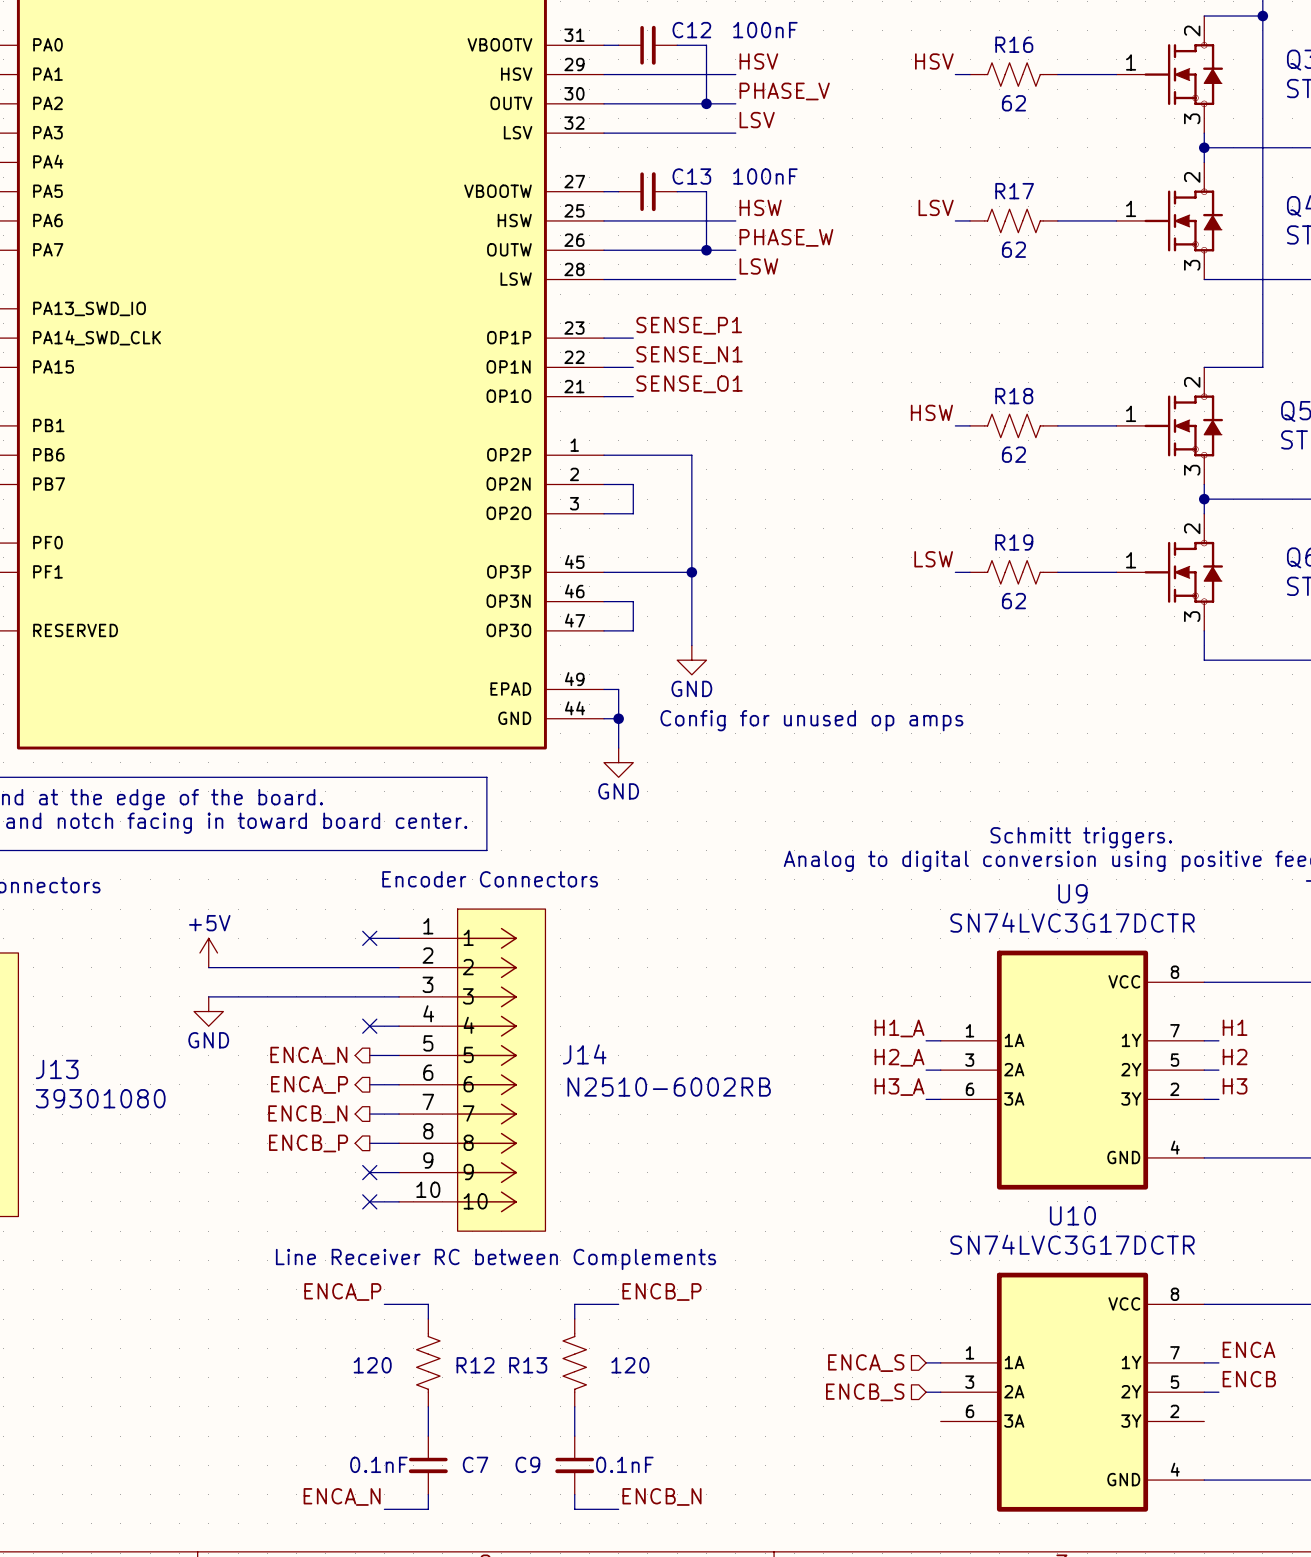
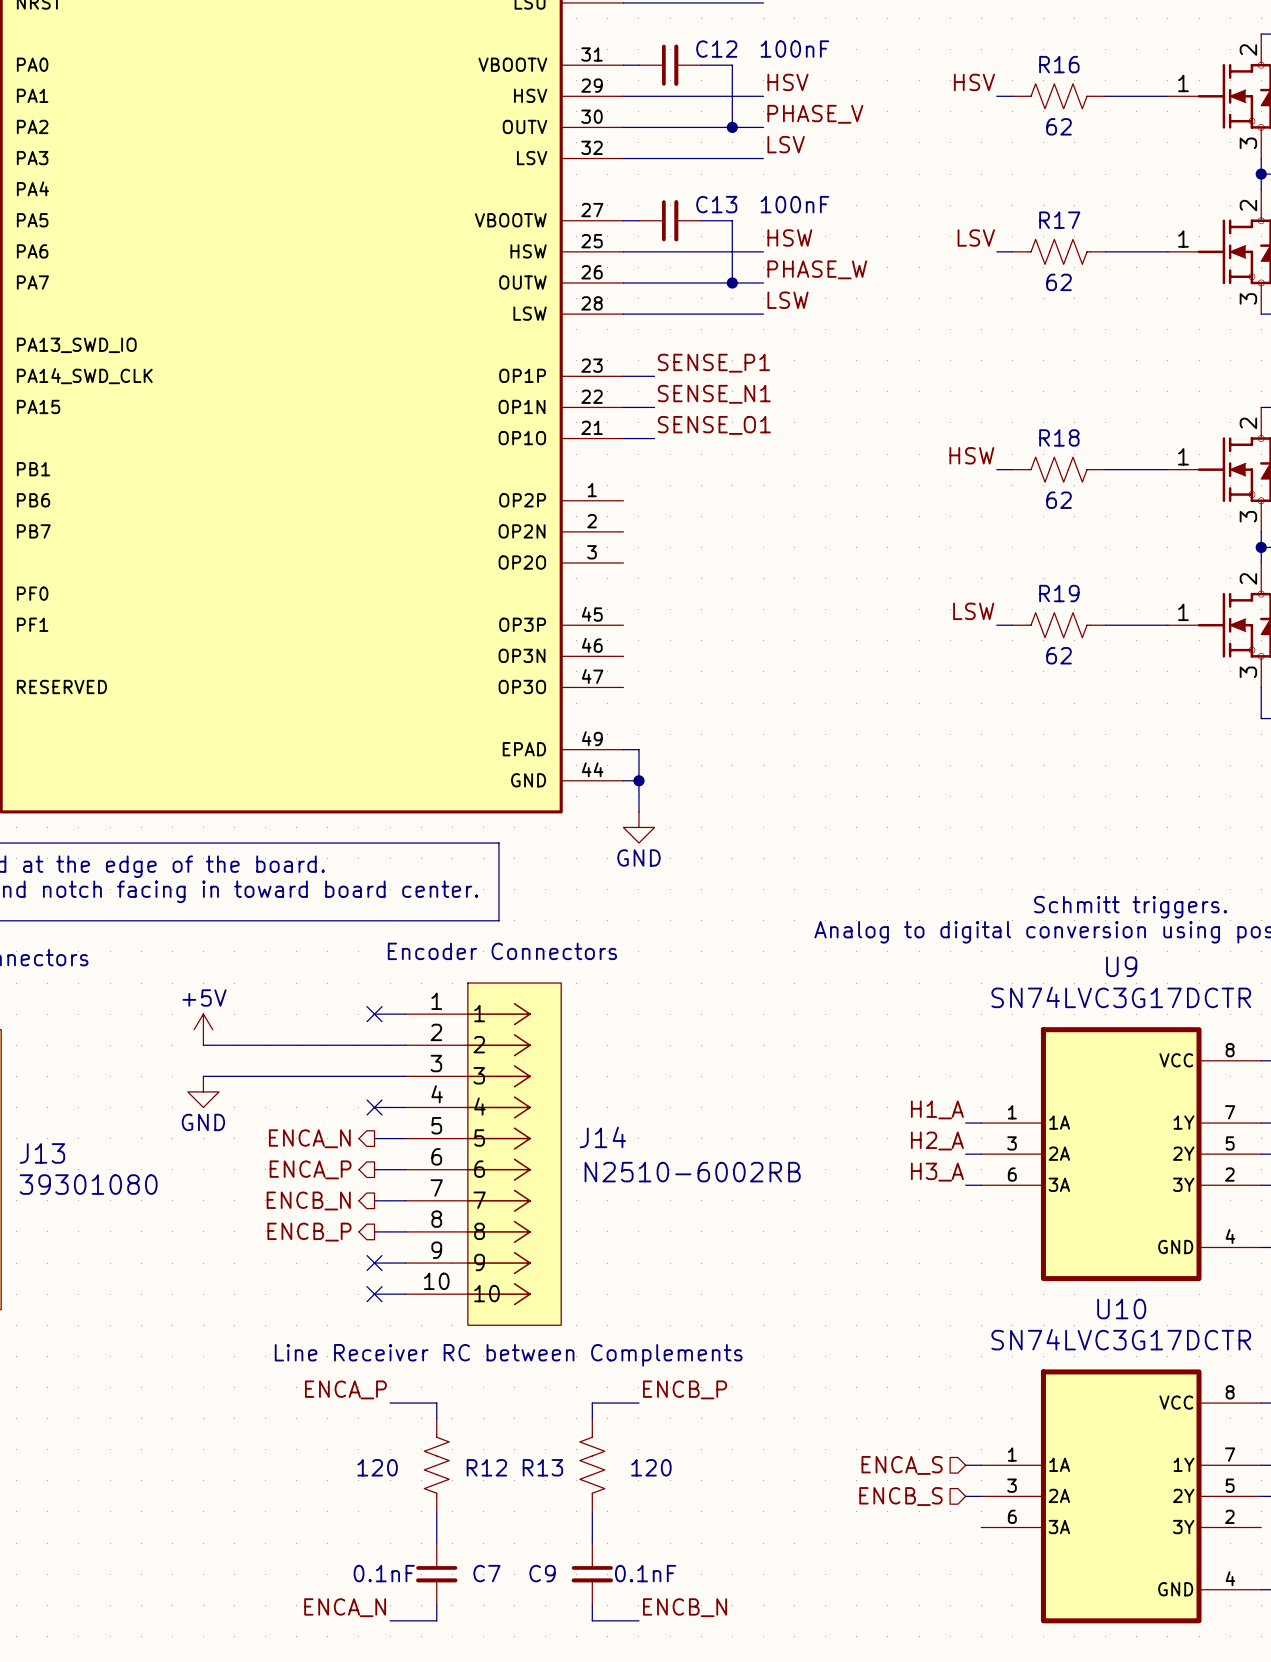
wire: (604, 455) (691, 455) (691, 645) -> none
wire: (604, 484) (633, 484) (633, 513) (604, 513) -> none
wire: (604, 572) (691, 572) -> none
junction: (691, 572) -> none
wire: (604, 601) (633, 601) (633, 630) (604, 630) -> none
power symbol: GND (691, 660) -> none
text: Config for unused op amps (811, 720) -> none

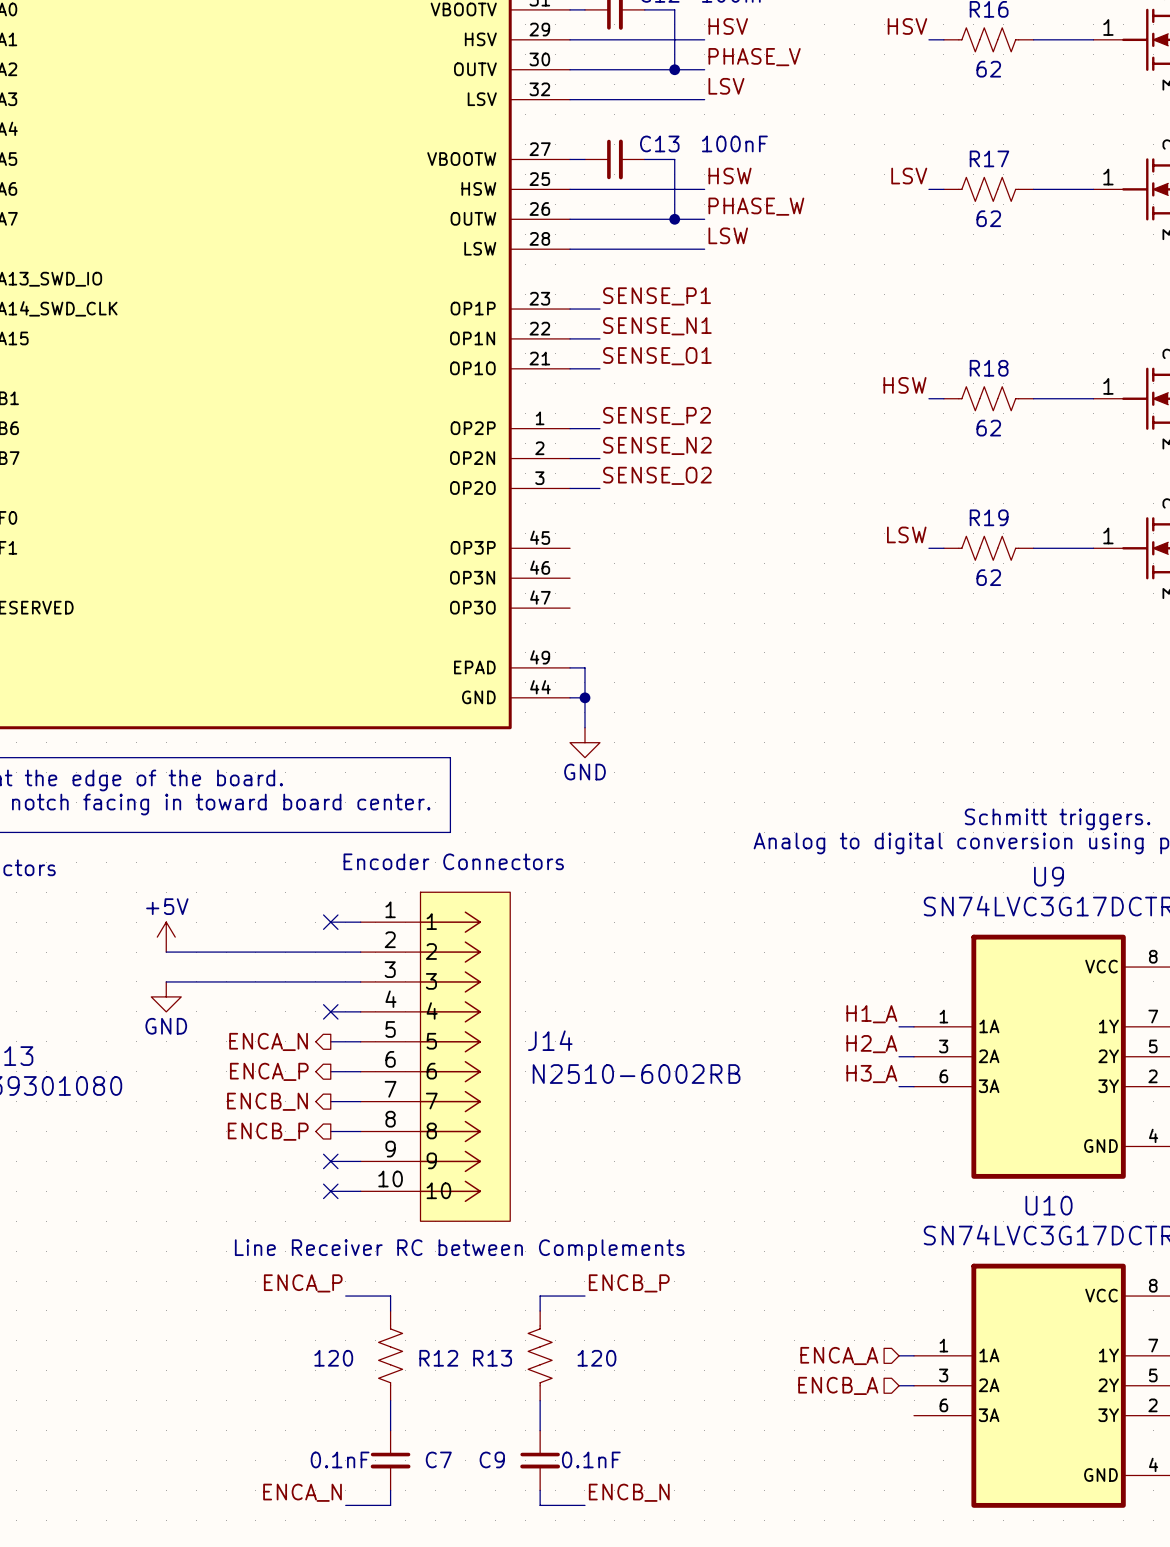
label: none -> SENSE_P2 (657, 416)
wire: none -> (570, 428) (599, 428)
label: none -> SENSE_N2 (657, 445)
wire: none -> (570, 458) (599, 458)
label: none -> SENSE_O2 (657, 475)
wire: none -> (570, 488) (599, 488)
hierarchical label: ENCA_S (902, 1465) -> ENCA_A (839, 1355)
hierarchical label: ENCB_S (900, 1496) -> ENCB_A (838, 1385)

